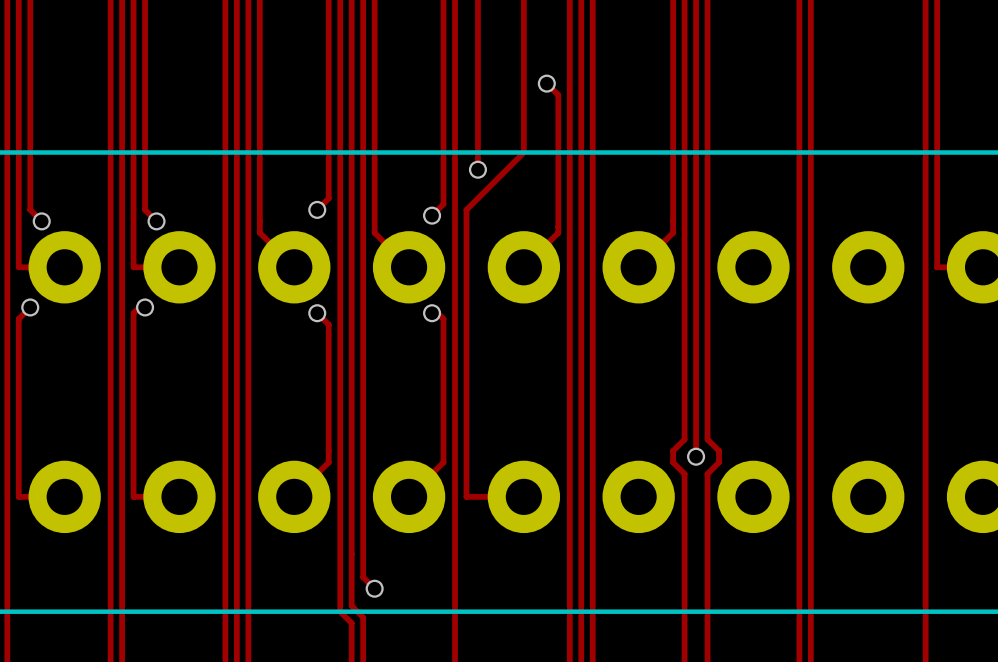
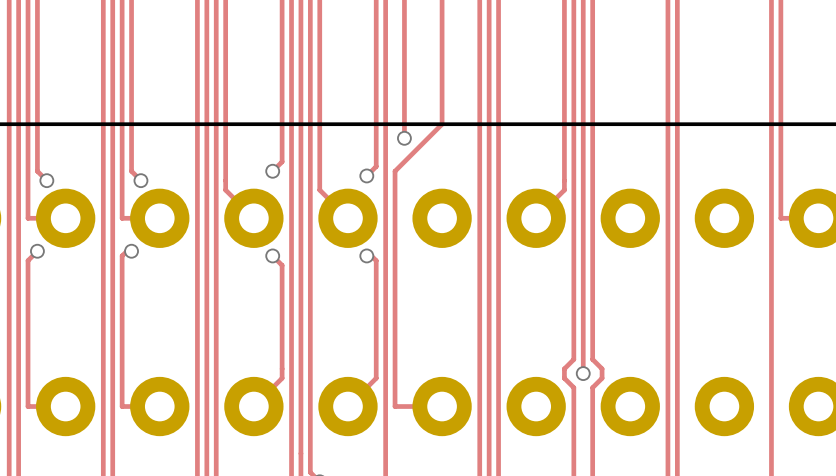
track: (546, 83) (558, 95) (558, 232) (523, 267) -> none
via: (546, 83) -> none

